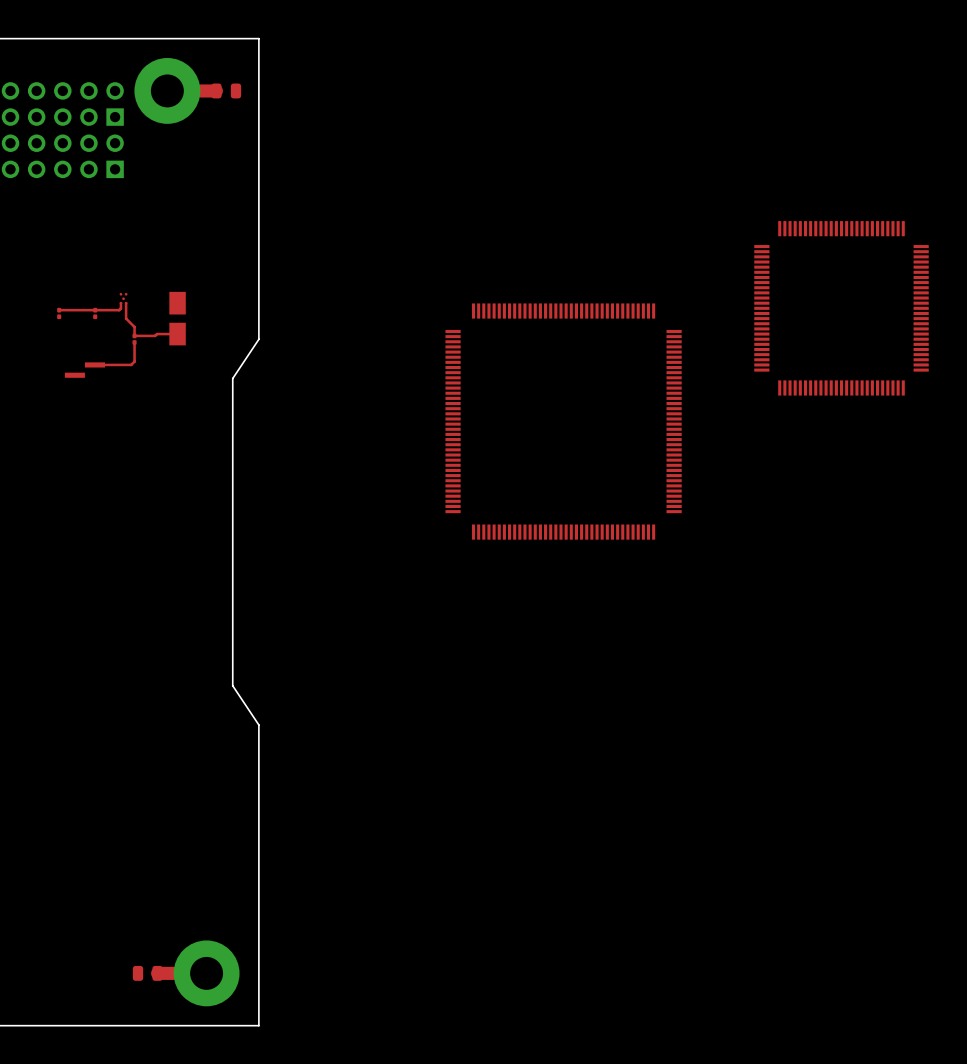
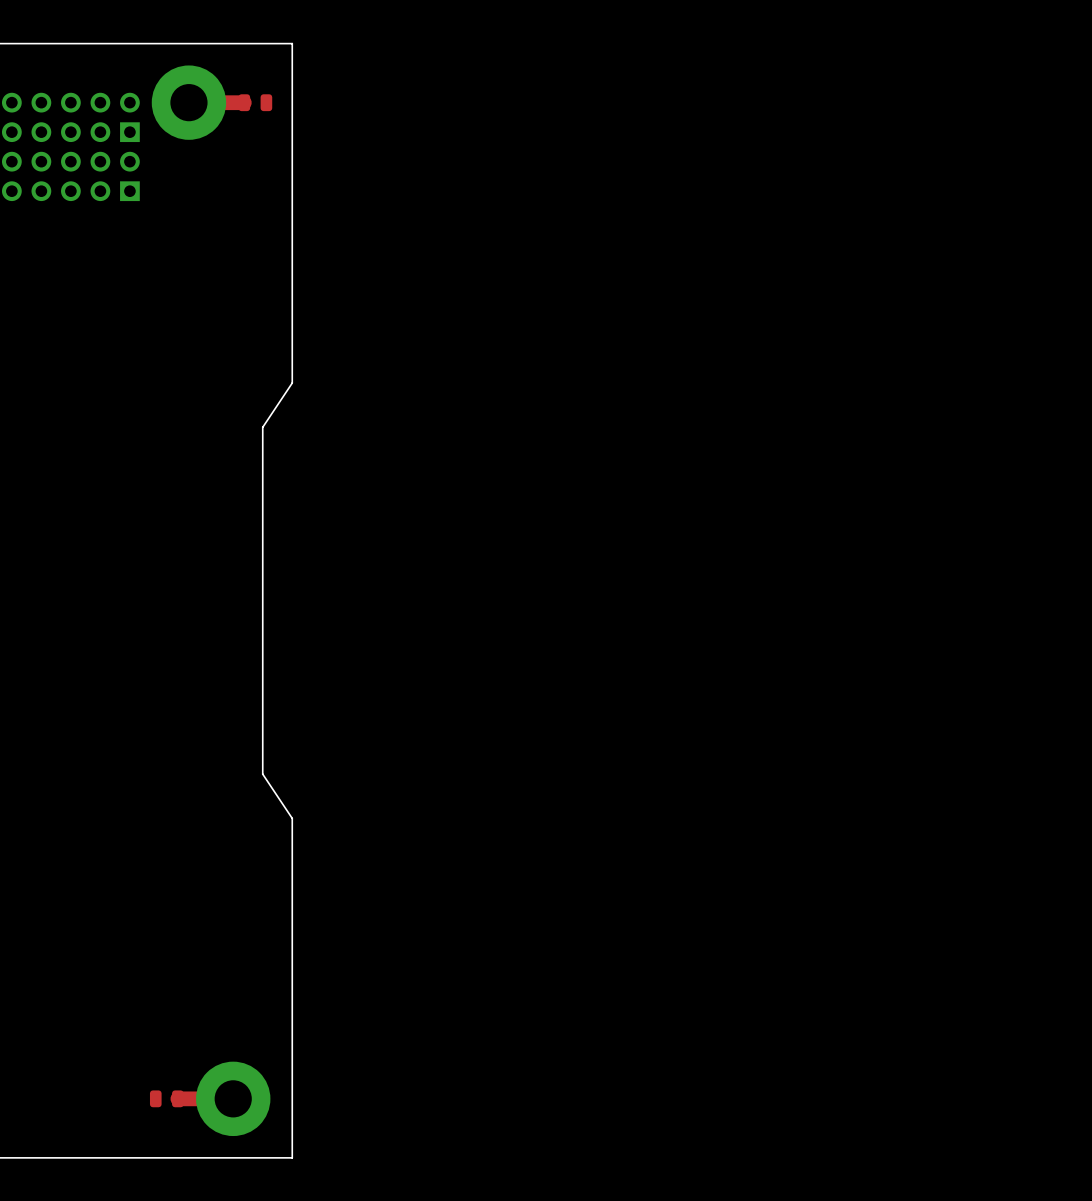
part: (123, 298) -> none
top track: (120, 303) (119, 310) (59, 310) -> none
top track: (126, 303) (126, 318) (134, 327) (134, 335) (177, 334) -> none
part: (841, 308) -> none
part: (59, 313) -> none
part: (95, 313) -> none
part: (177, 318) -> none
part: (134, 339) -> none
top track: (134, 342) (134, 361) (131, 364) (94, 364) -> none
part: (84, 370) -> none
part: (563, 421) -> none

